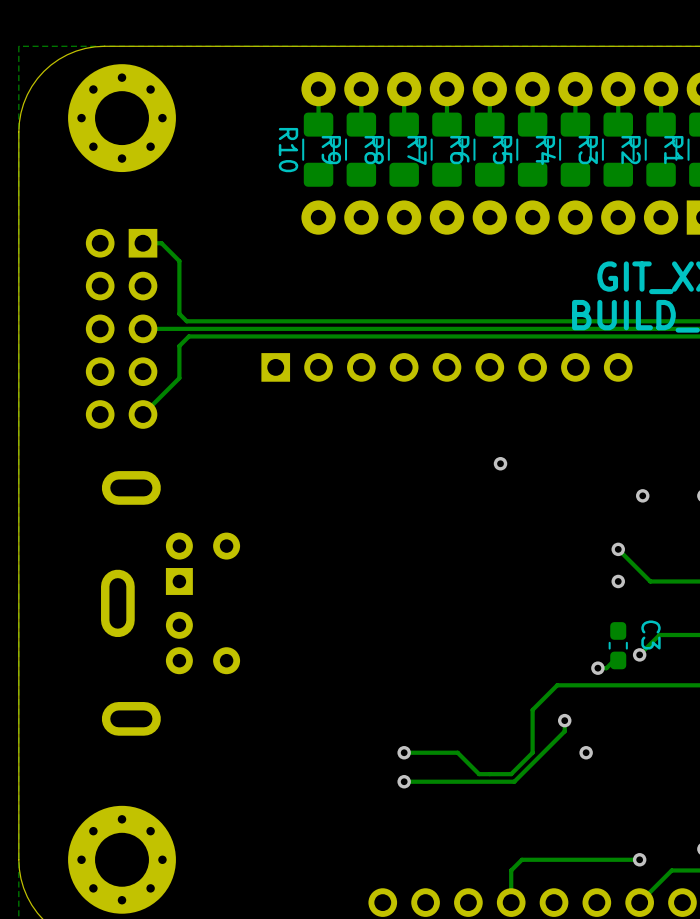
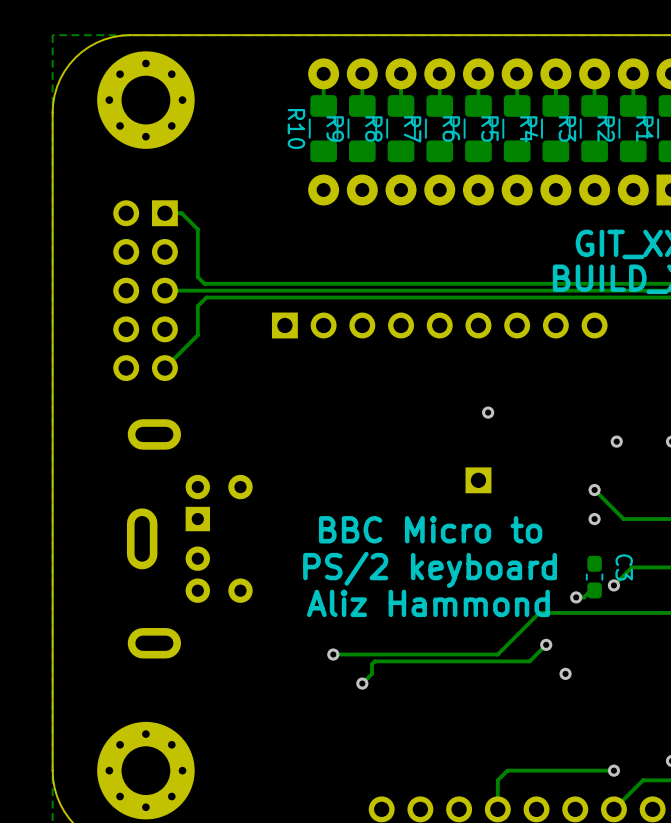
part: none -> (478, 480)
text: none -> BBC Micro to (430, 529)
text: none -> PS/2 keyboard (430, 569)
text: none -> Aliz Hammond (428, 603)
track: (532, 709) (532, 752) (511, 774) (479, 774) (457, 752) (404, 752) -> (517, 635) (497, 654) (333, 654)
track: (564, 720) (564, 731) (514, 781) (401, 781) -> (546, 644) (529, 661) (374, 661) (372, 664) (372, 673) (362, 683)
via: none -> (333, 654)
via: (404, 752) -> none
via: none -> (362, 683)
via: (404, 781) -> none

